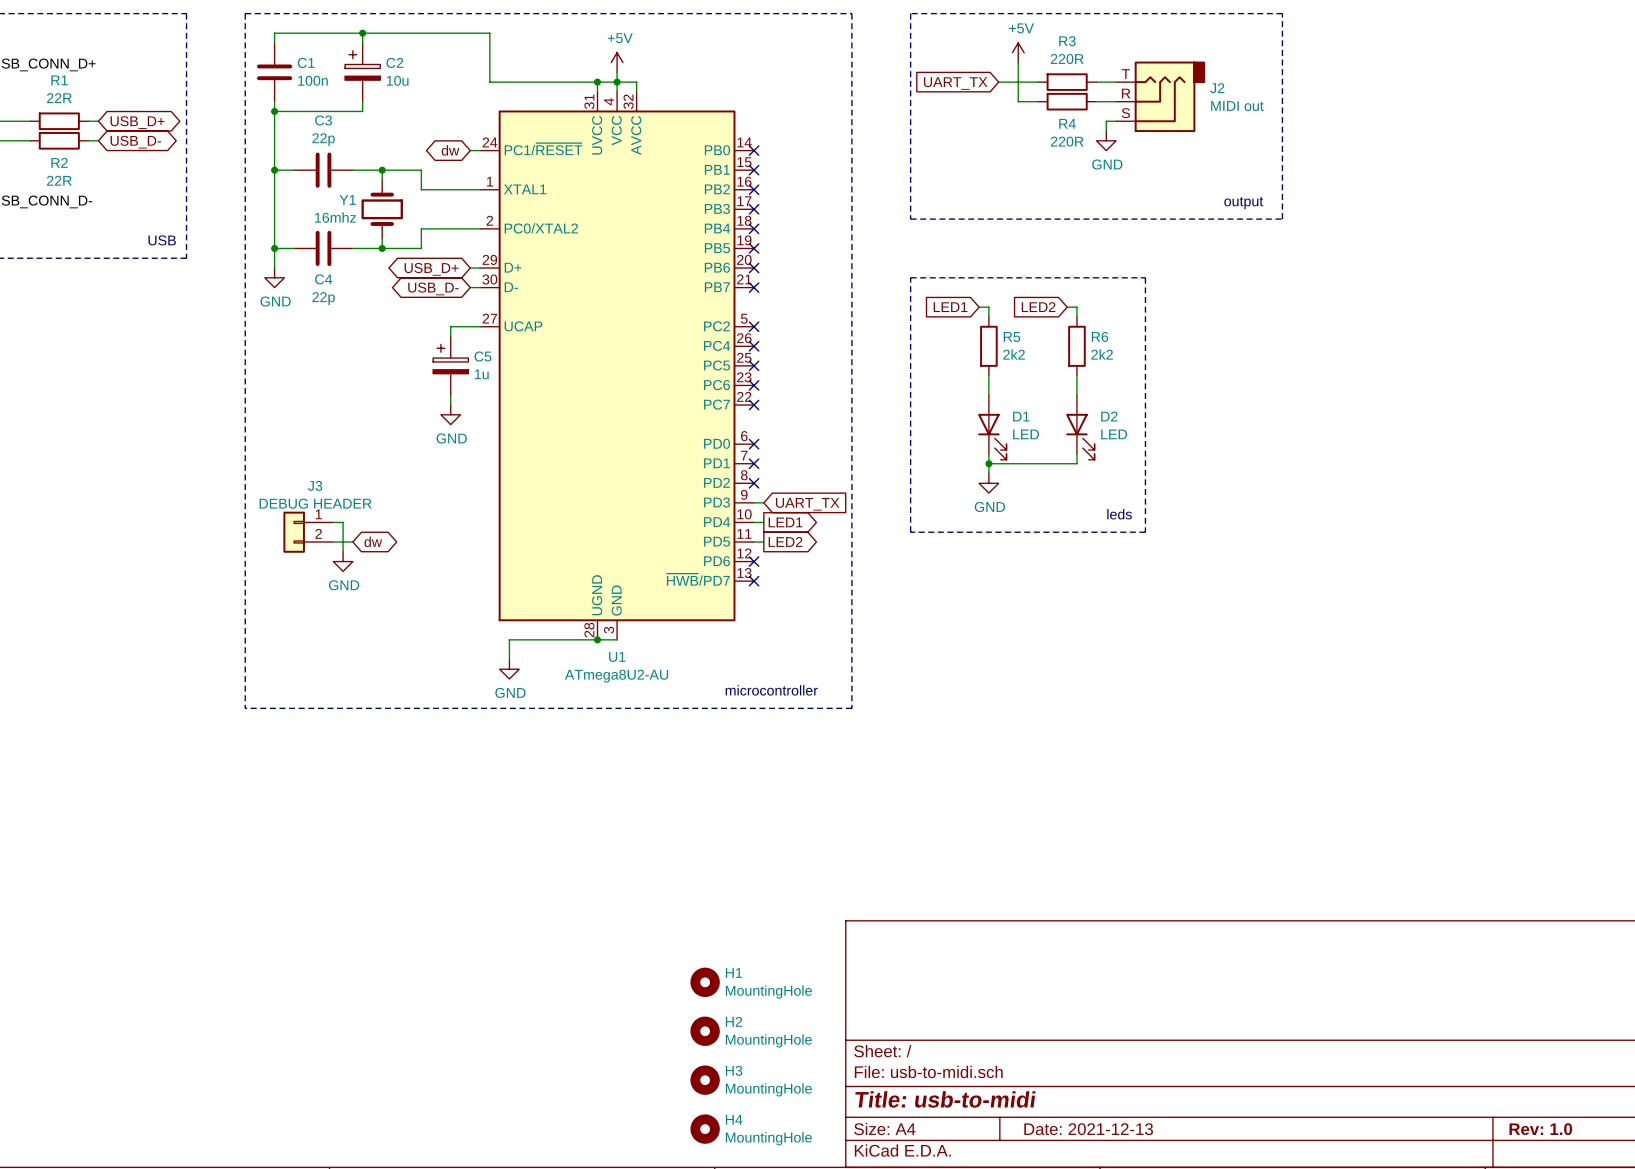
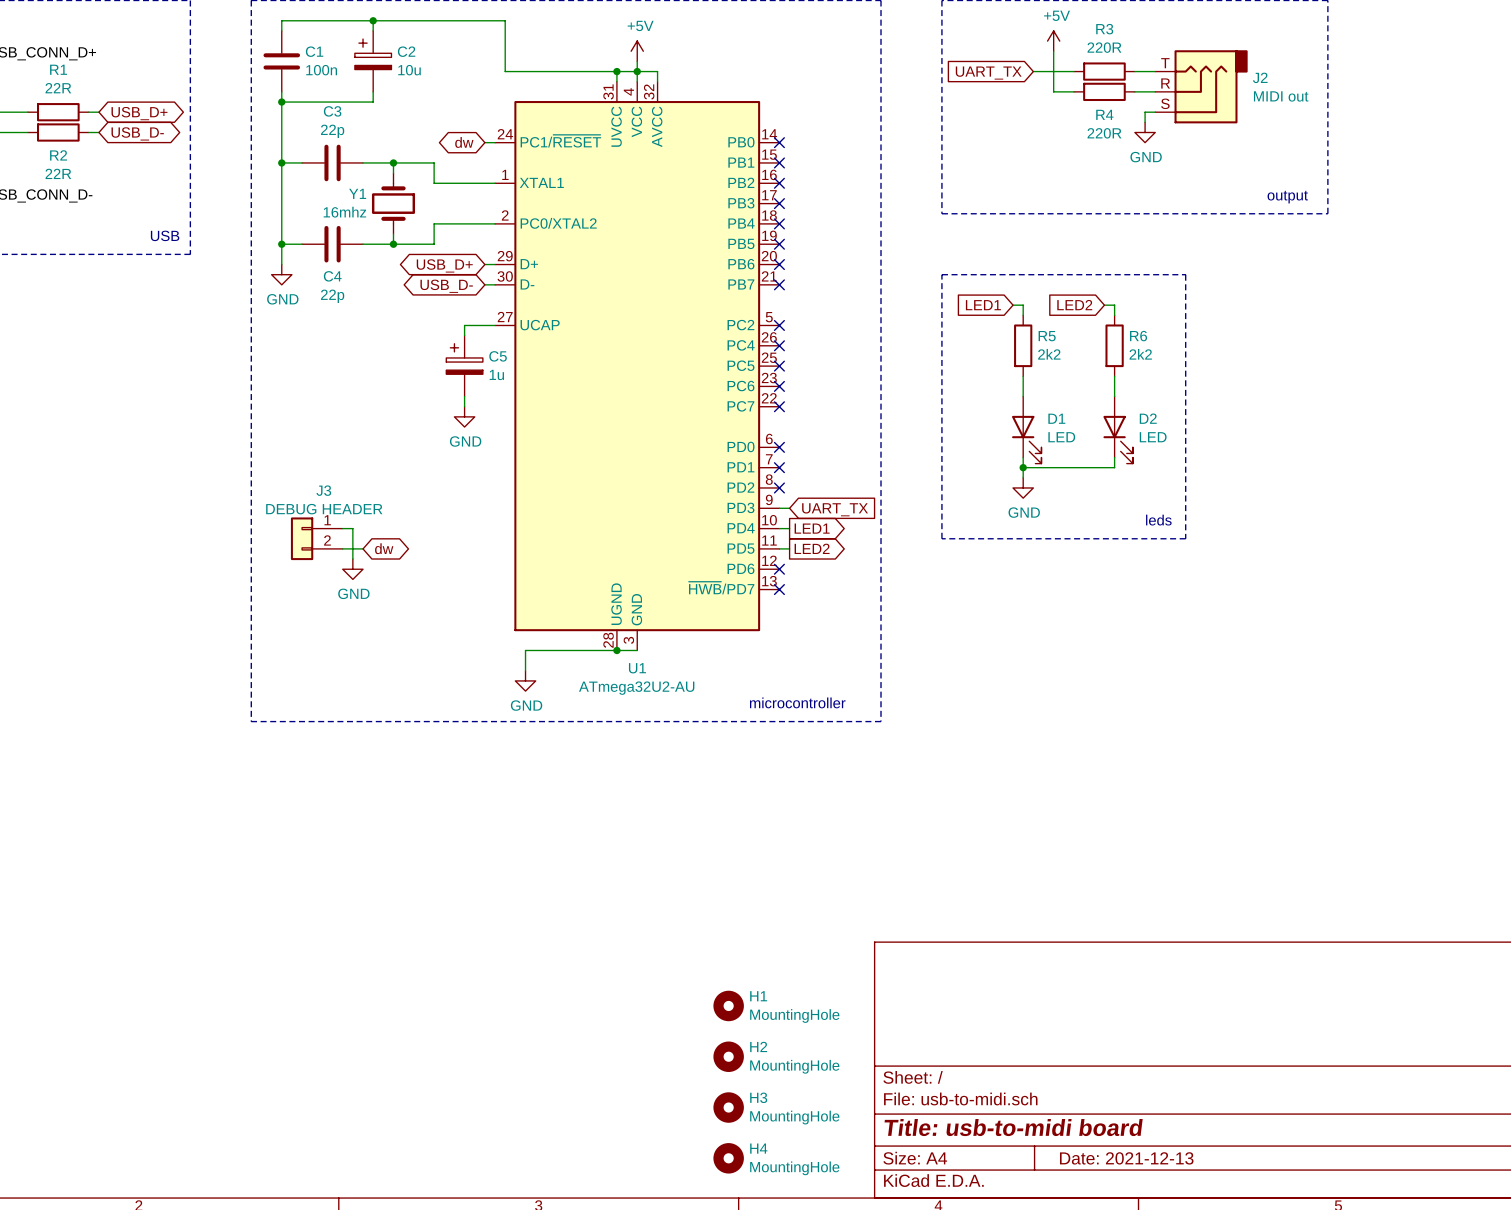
U1 value: ATmega8U2-AU (616, 676) -> ATmega32U2-AU (636, 688)
title block: Title: usb-to-midi (945, 1099) -> Title: usb-to-midi board (1013, 1127)

